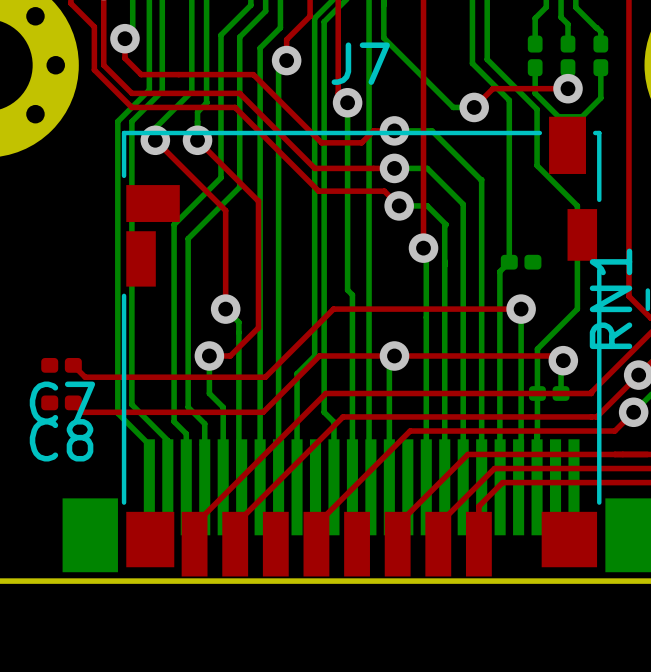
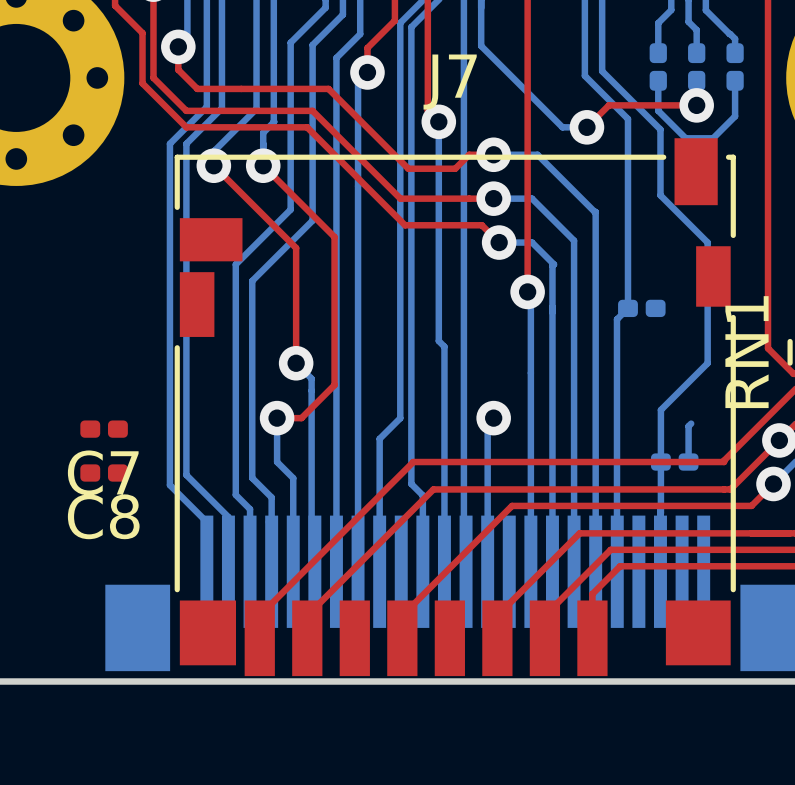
bottom track: (521, 309) (521, 484) (518, 487) -> none
top track: (521, 309) (333, 309) (265, 377) (85, 377) (73, 365) -> none
via: (521, 309) -> none
top track: (563, 360) (558, 355) (319, 355) (263, 412) (82, 412) (73, 402) -> none
via: (563, 360) -> none

